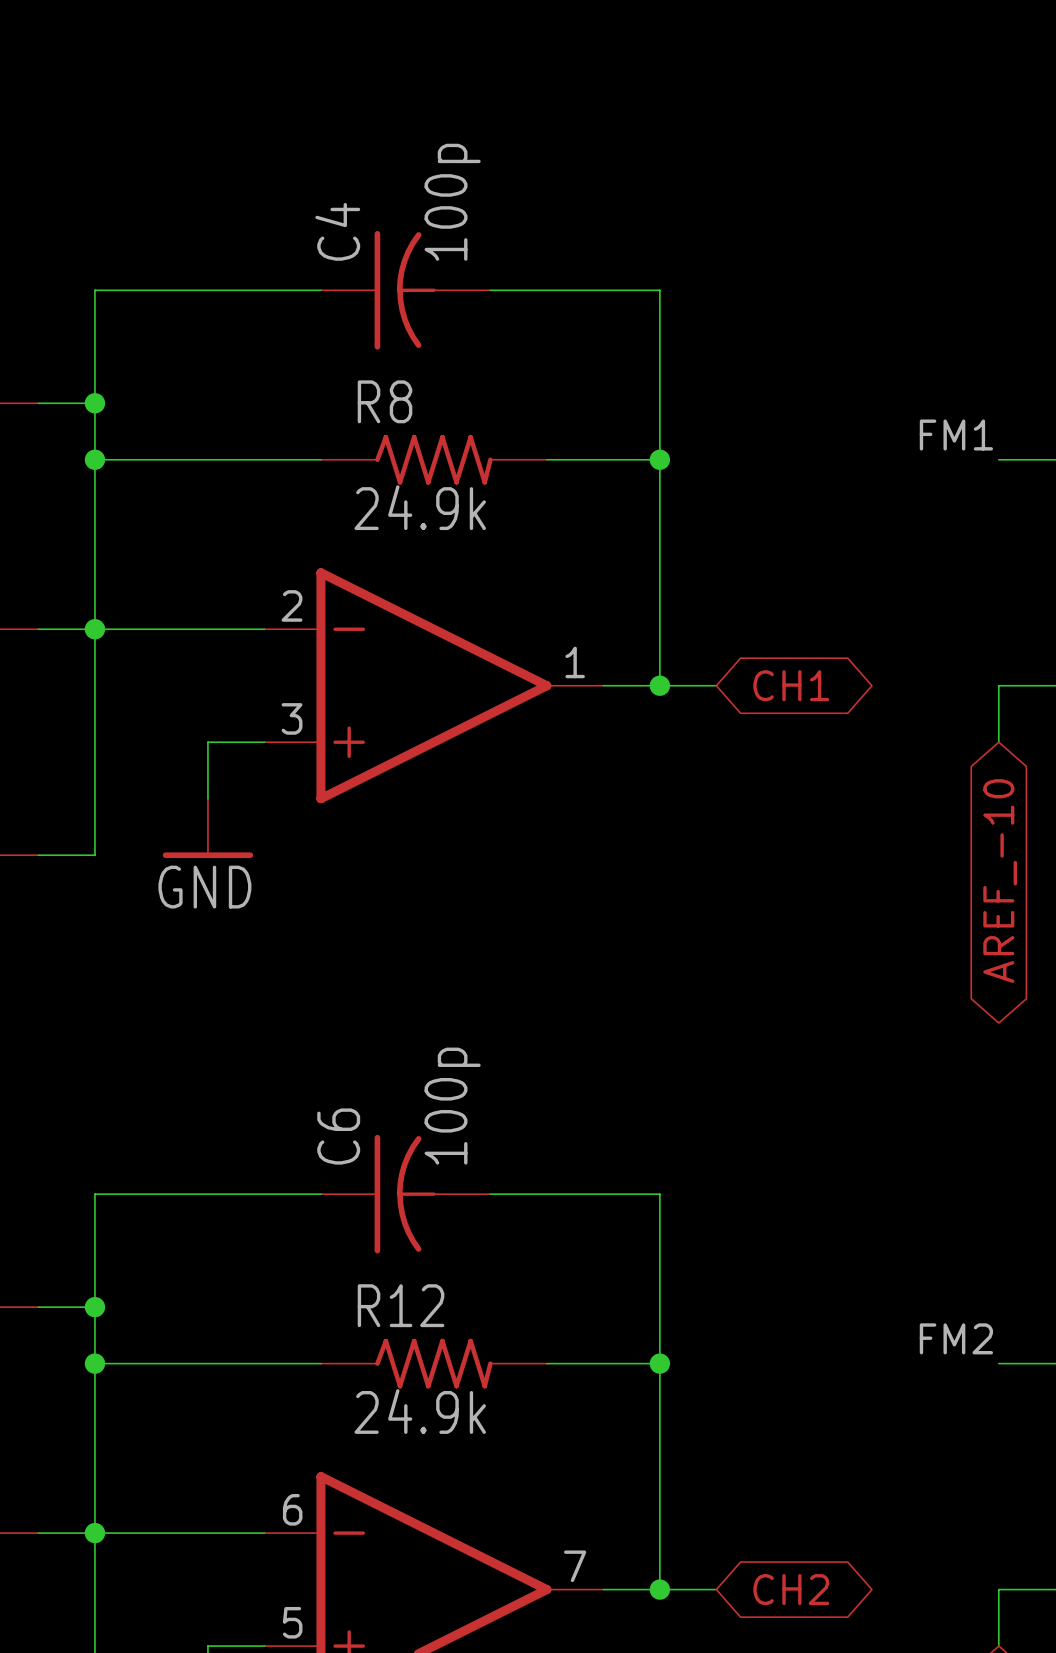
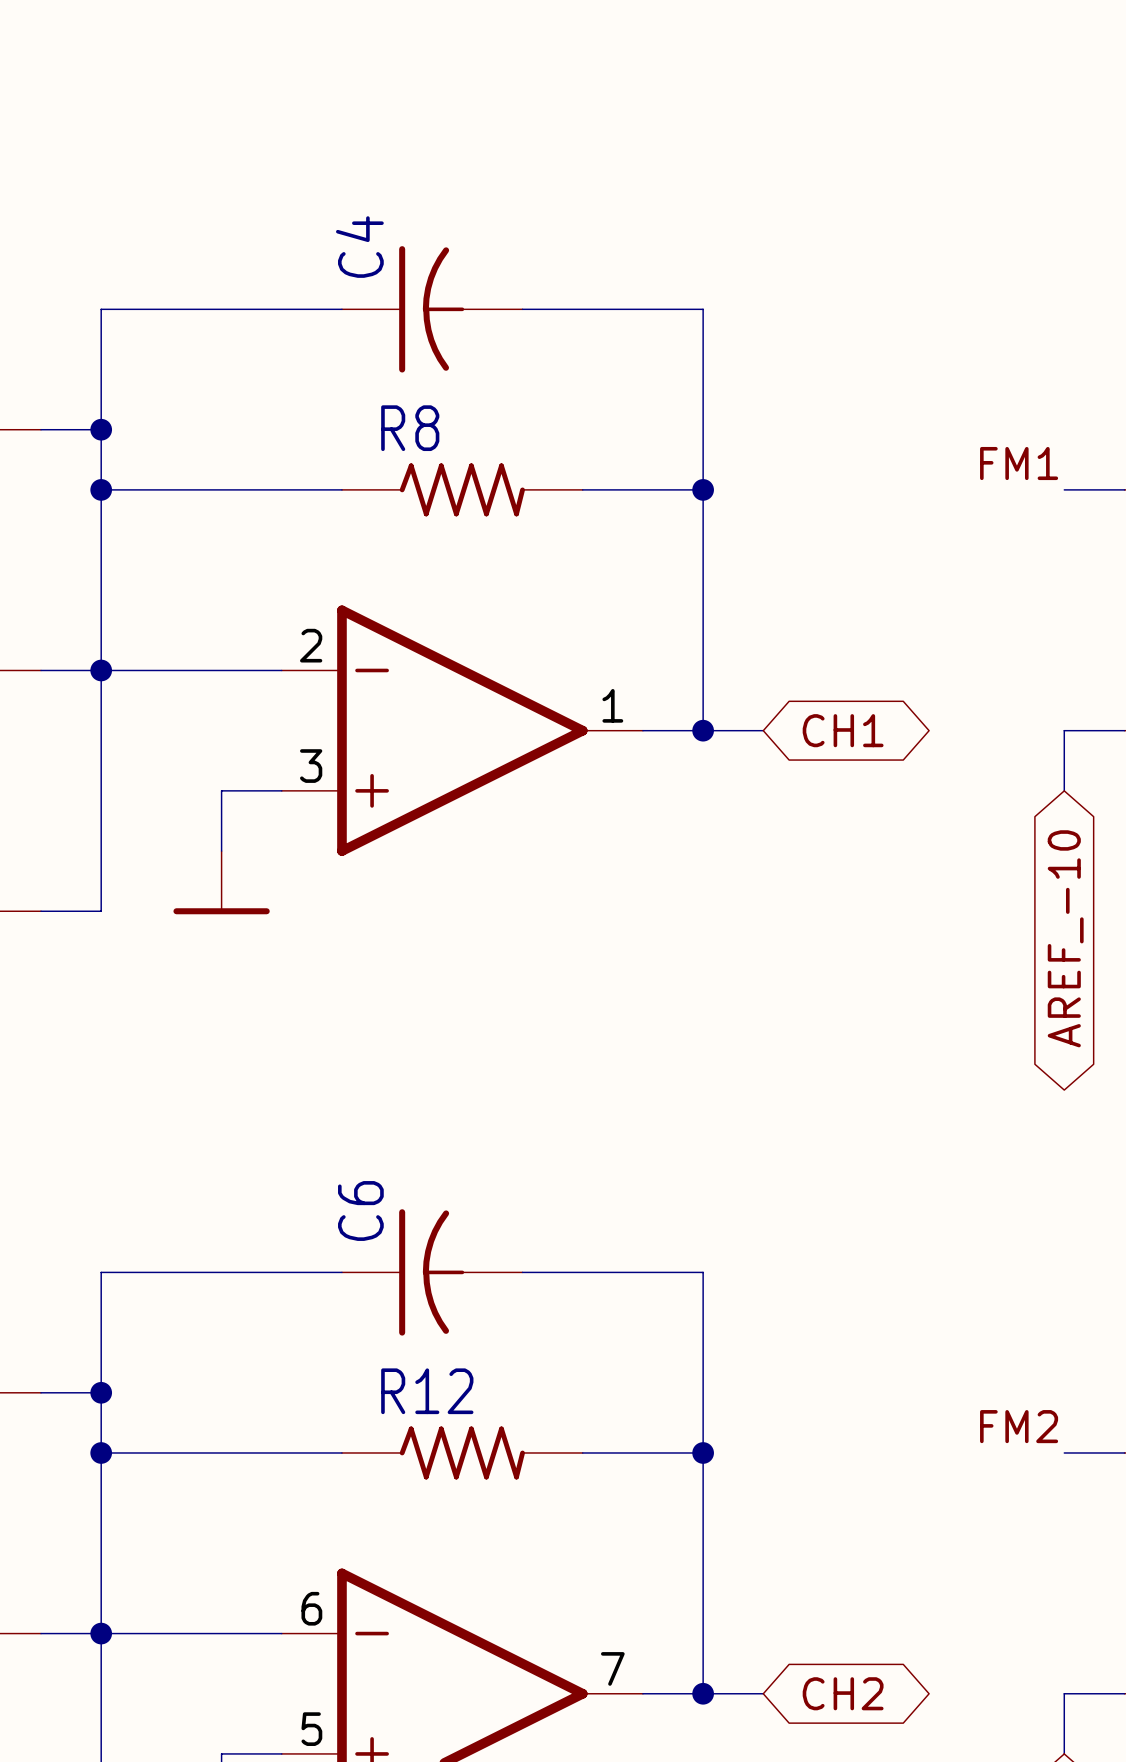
C4 value: 100p (452, 202) -> none
R8 value: 24.9k (420, 507) -> none
power symbol text: GND (204, 887) -> none
C6 value: 100p (452, 1106) -> none
R12 value: 24.9k (420, 1411) -> none

